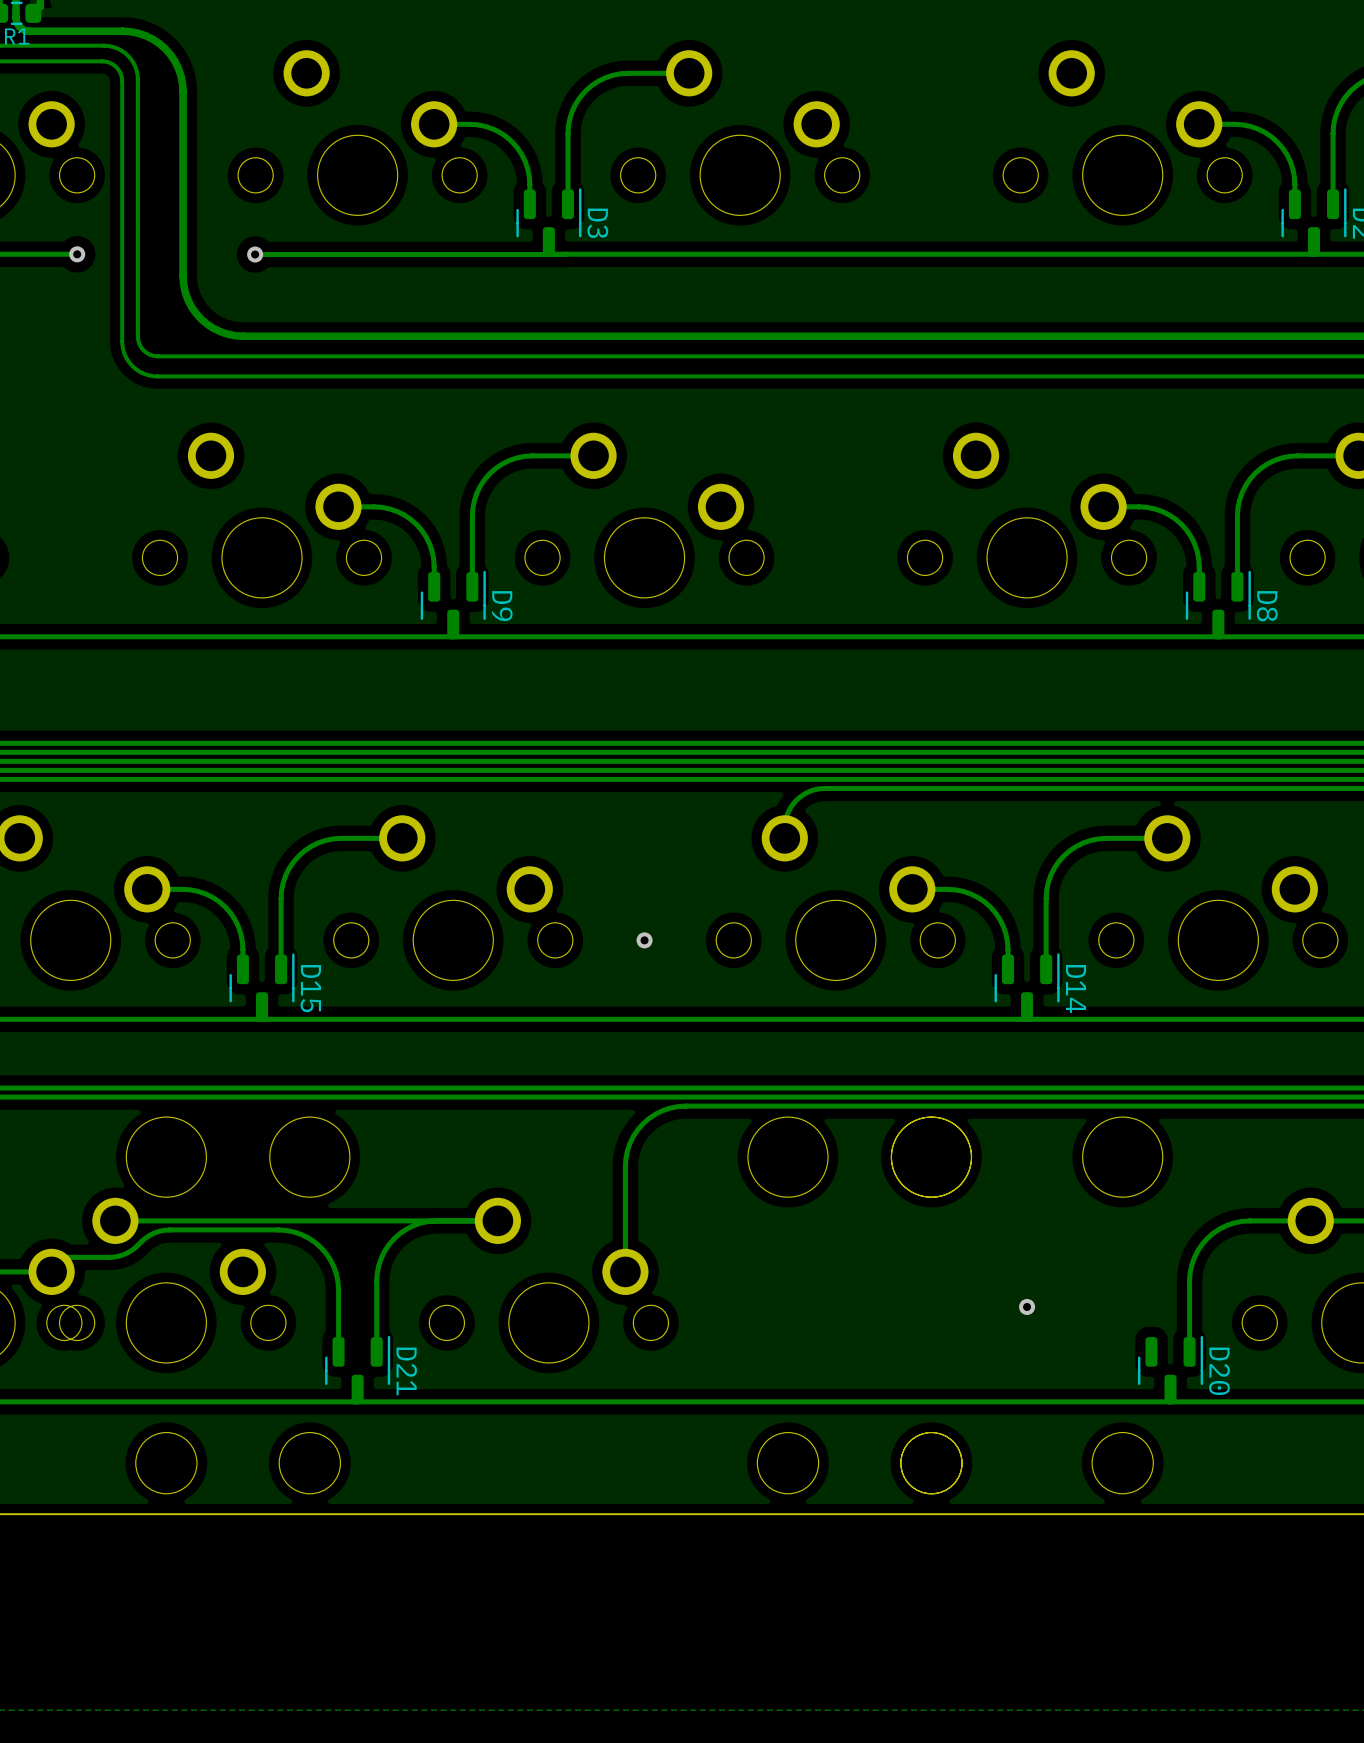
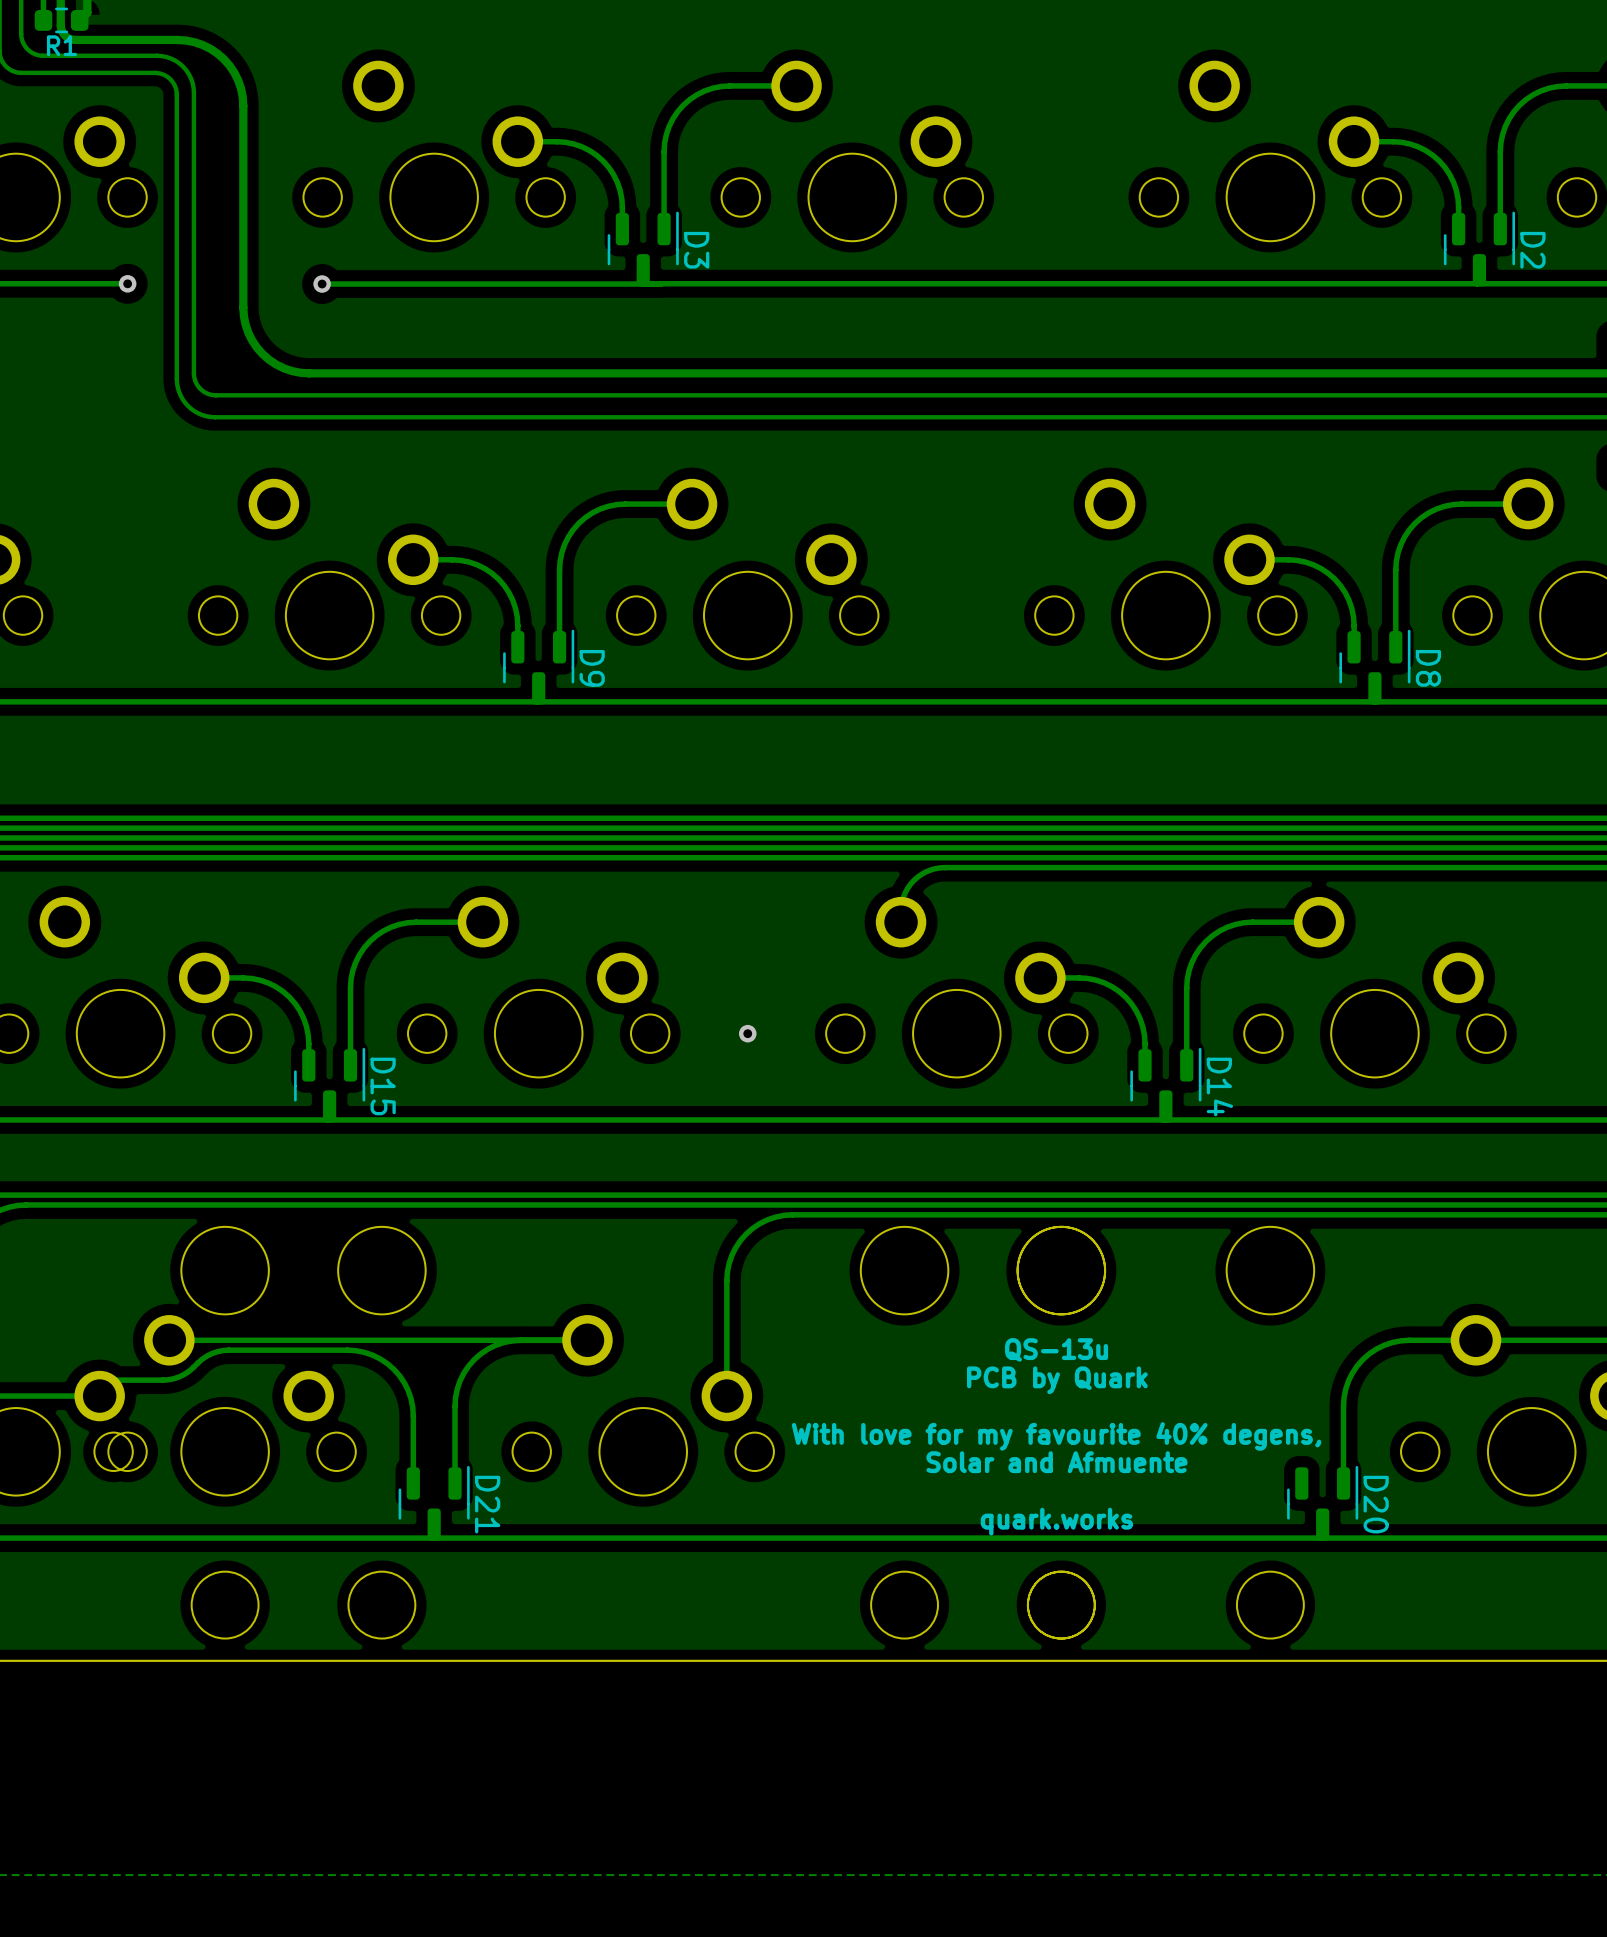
text: none -> QS-13u (1056, 1349)
text: none -> PCB by Quark (1057, 1380)
via: (1027, 1306) -> none
text: none -> With love for my favourite 40% degens, (1056, 1436)
text: none -> Solar and Afmuente (1056, 1462)
text: none -> quark.works (1056, 1521)

